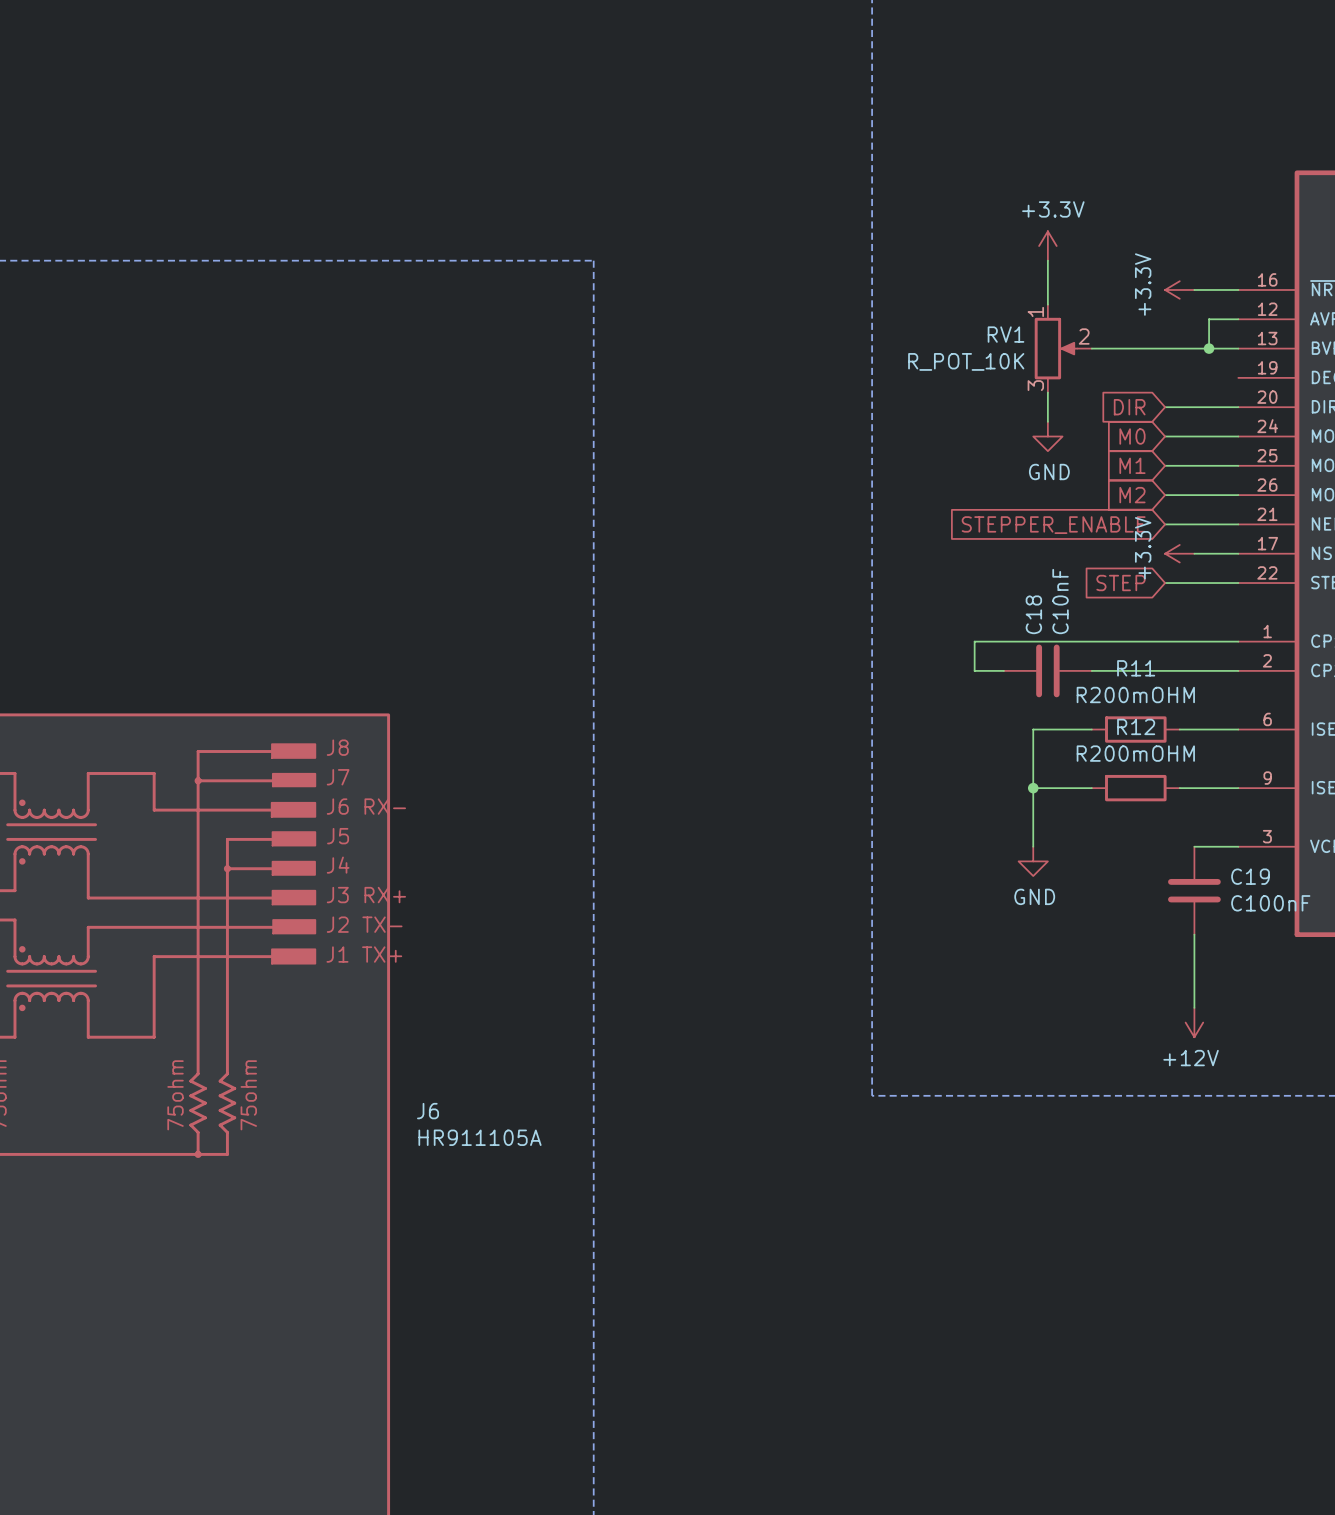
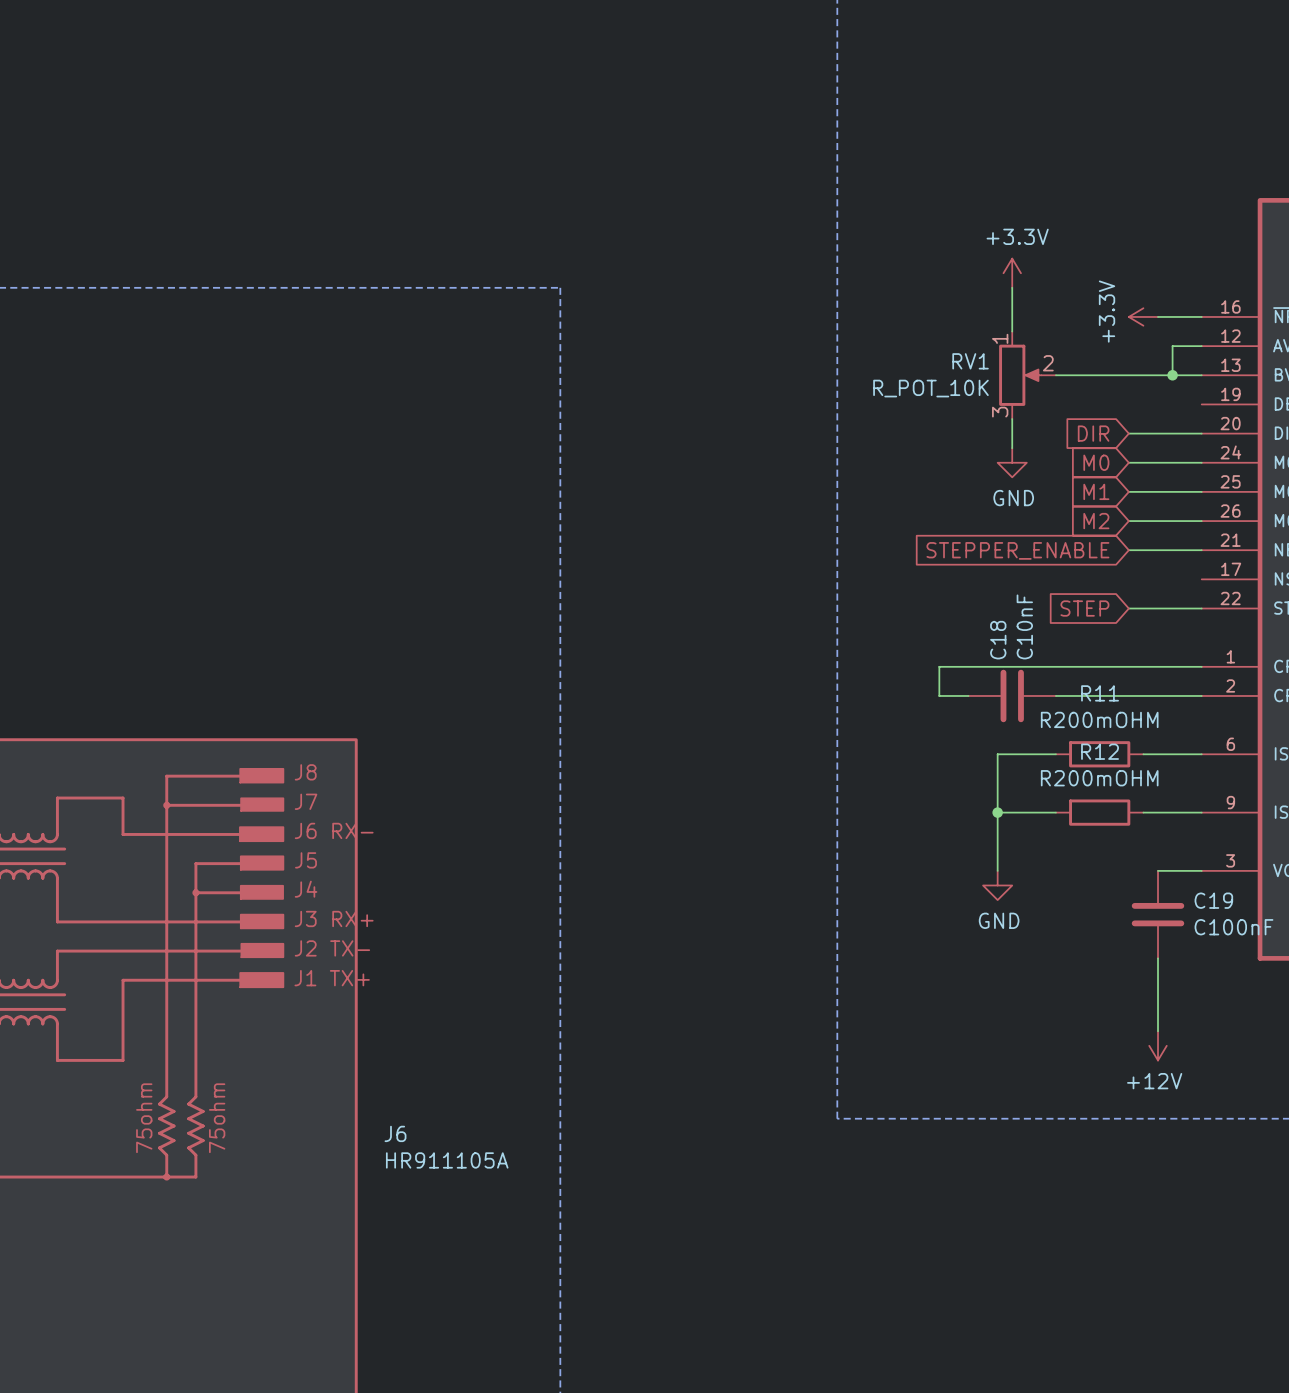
power symbol: +3.3V (1179, 553) -> none
wire: (1194, 553) (1238, 553) -> none

